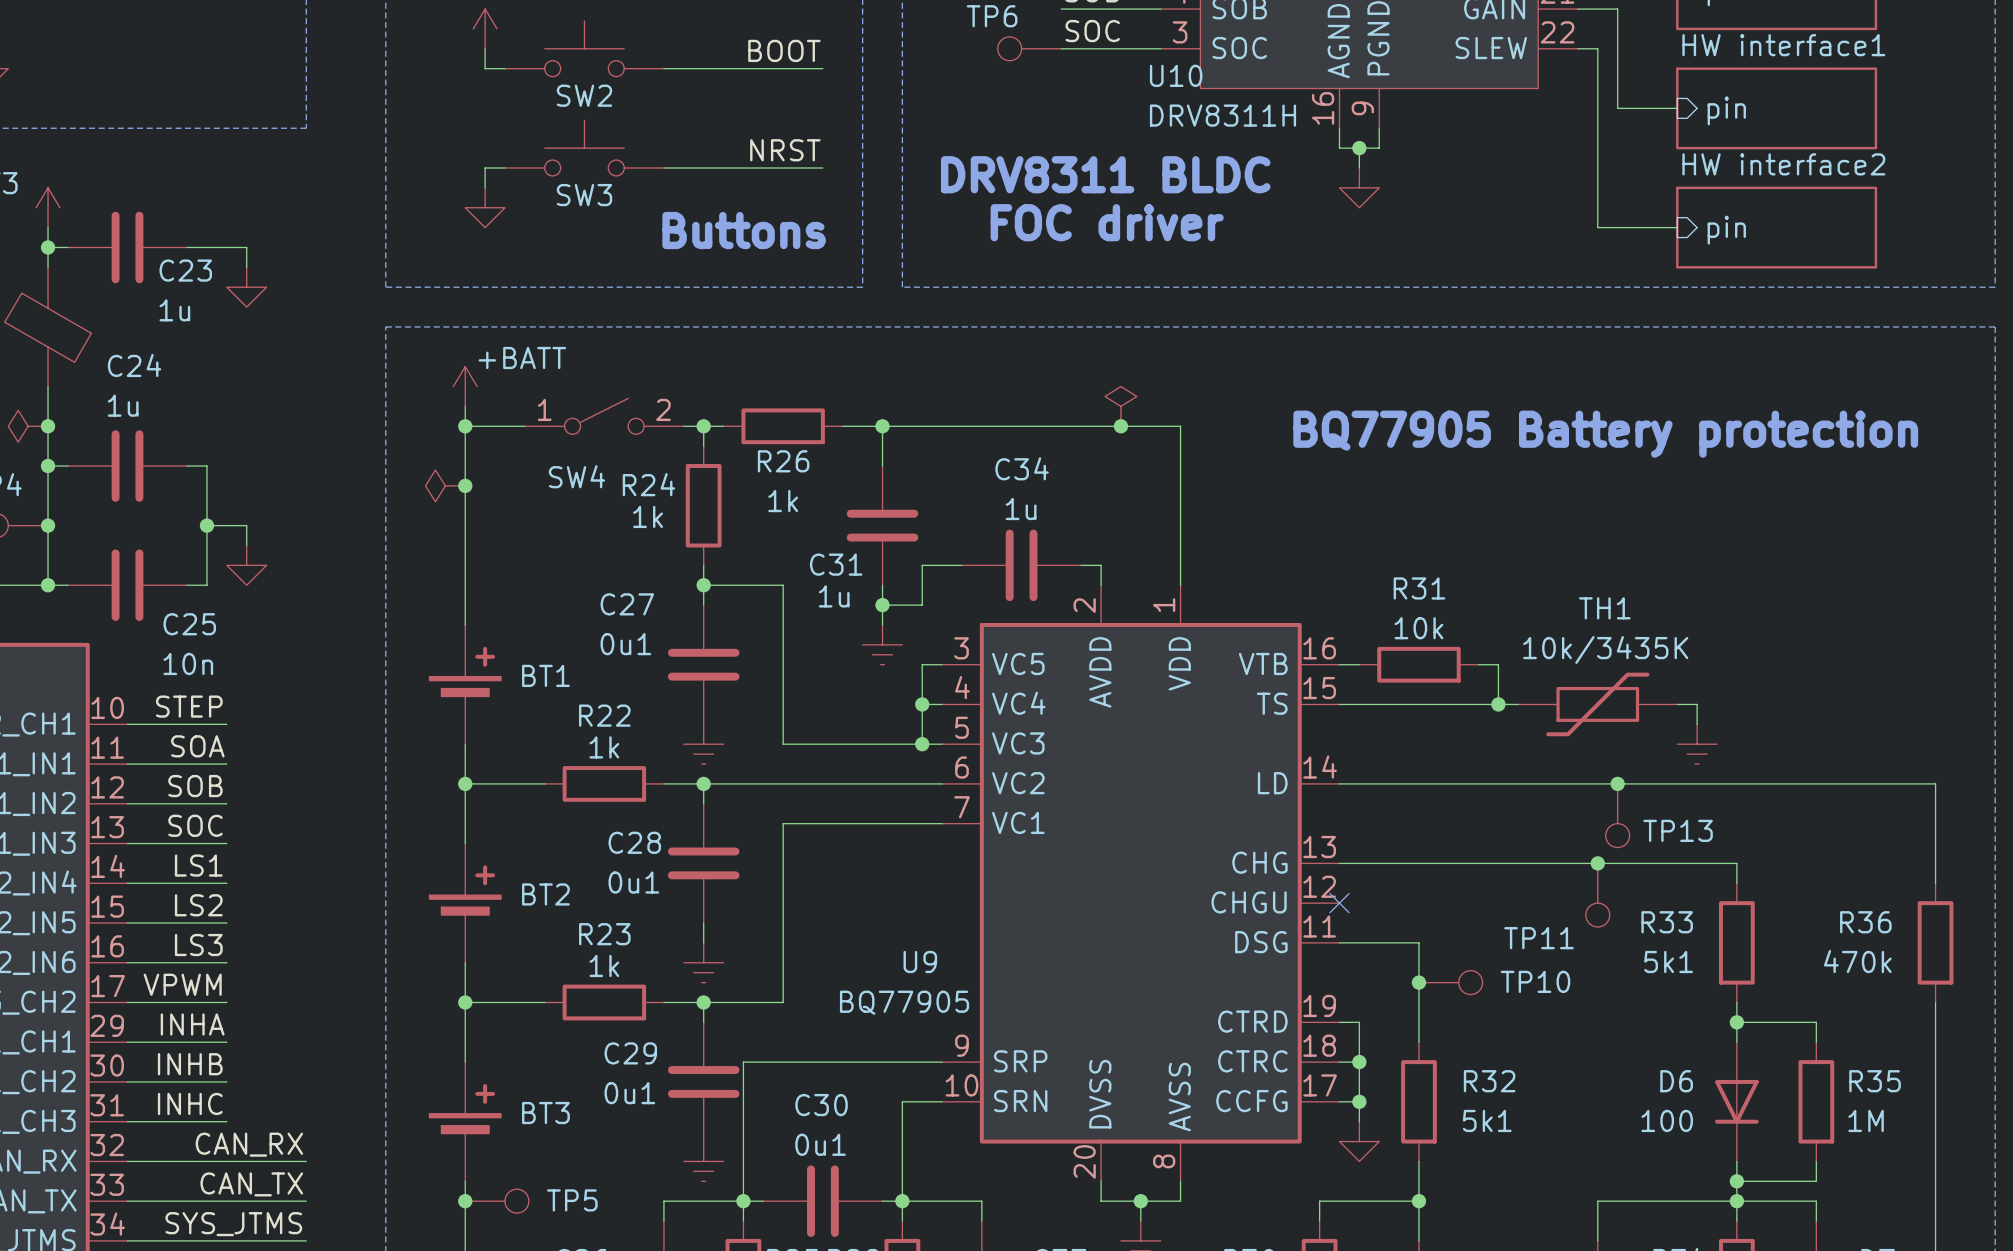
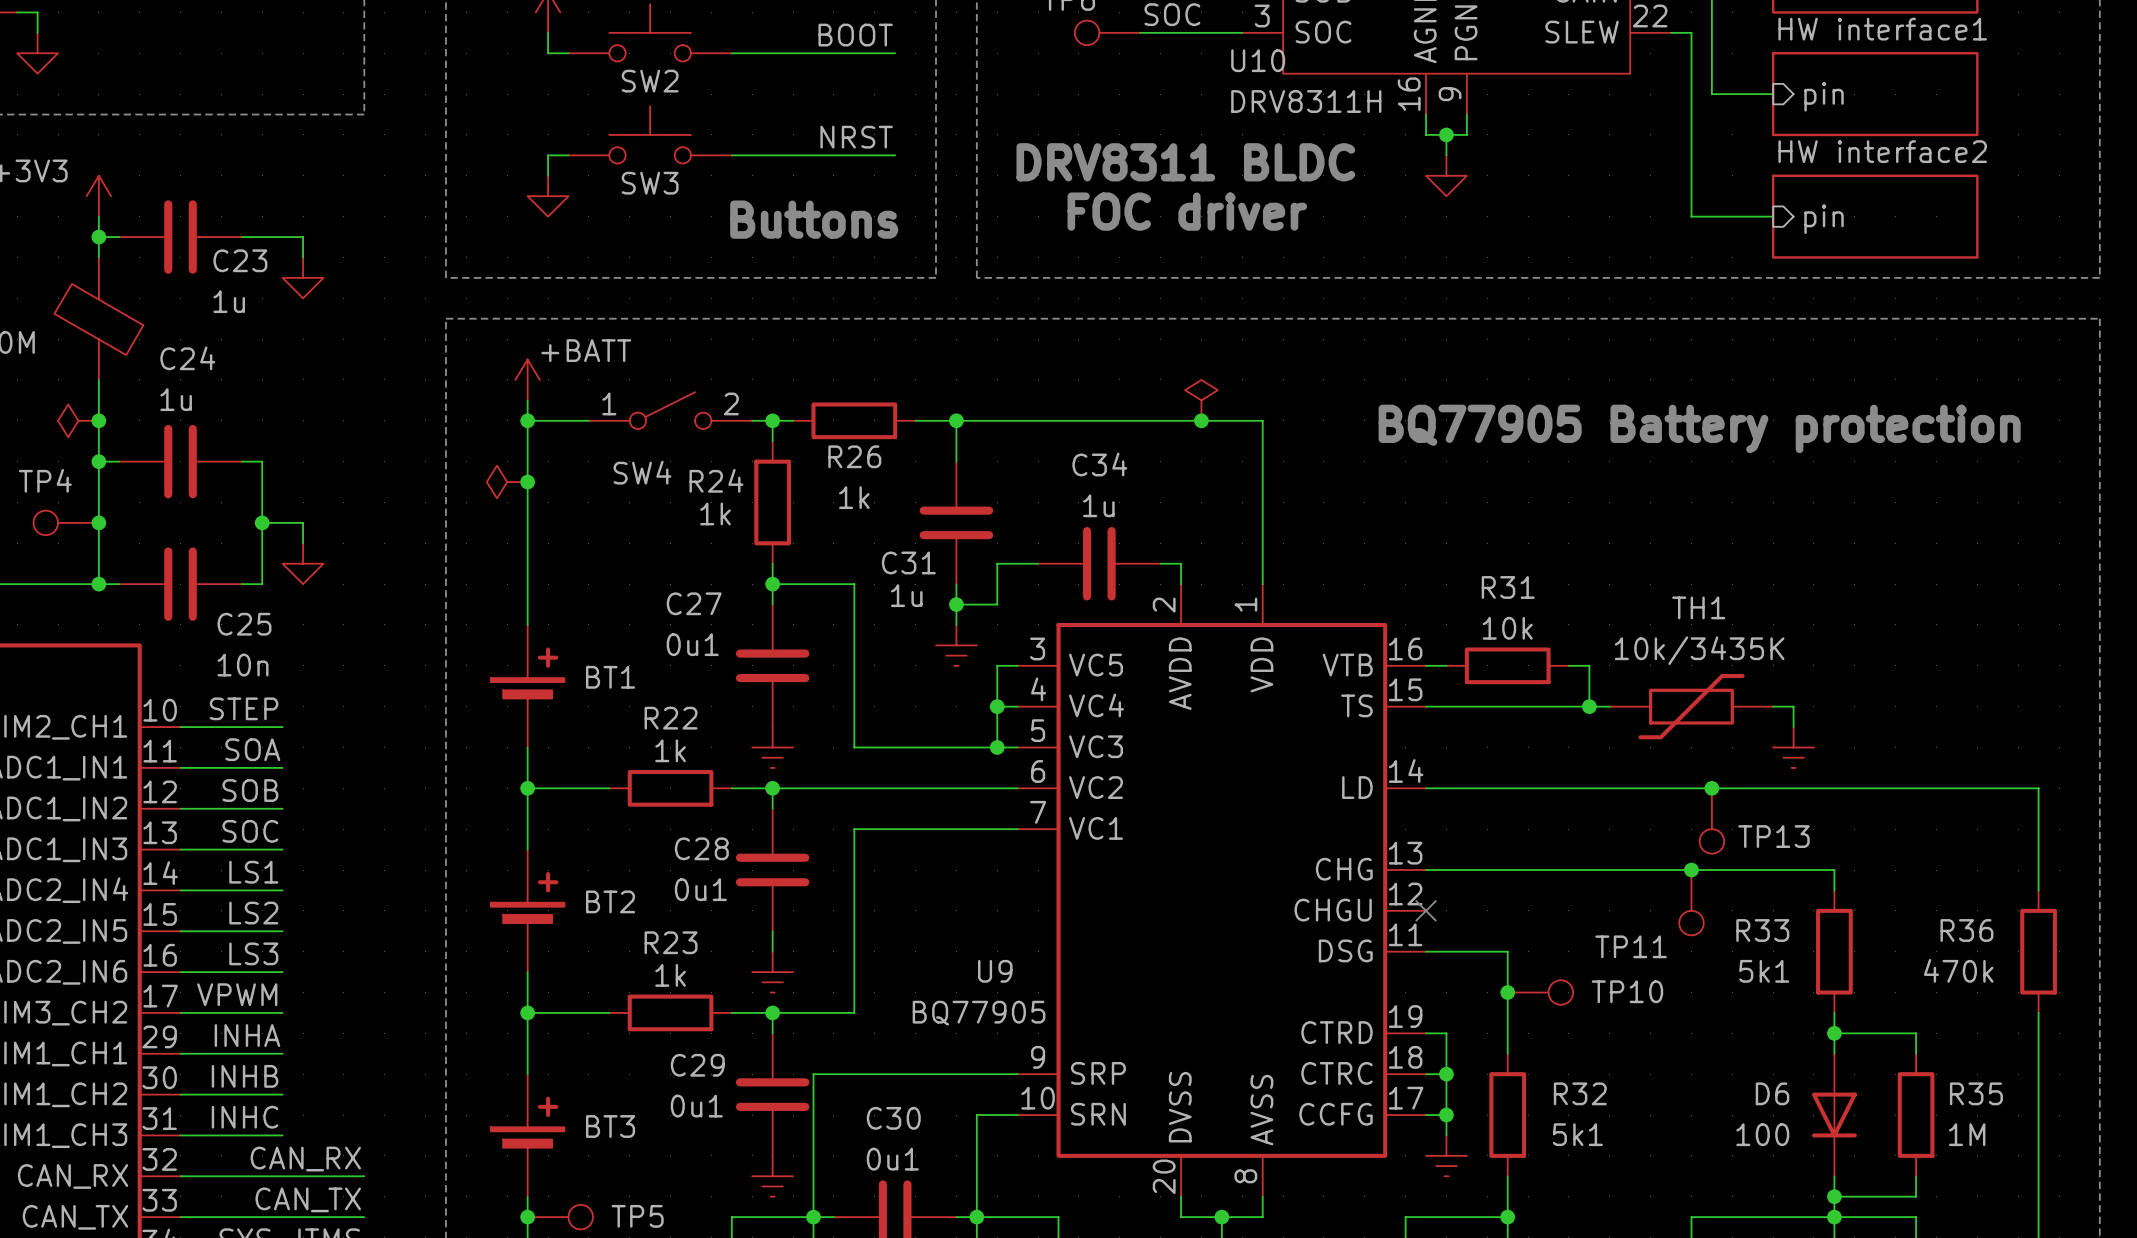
power symbol shape: [1339, 1121, 1380, 1162] -> [1426, 1135, 1467, 1177]

